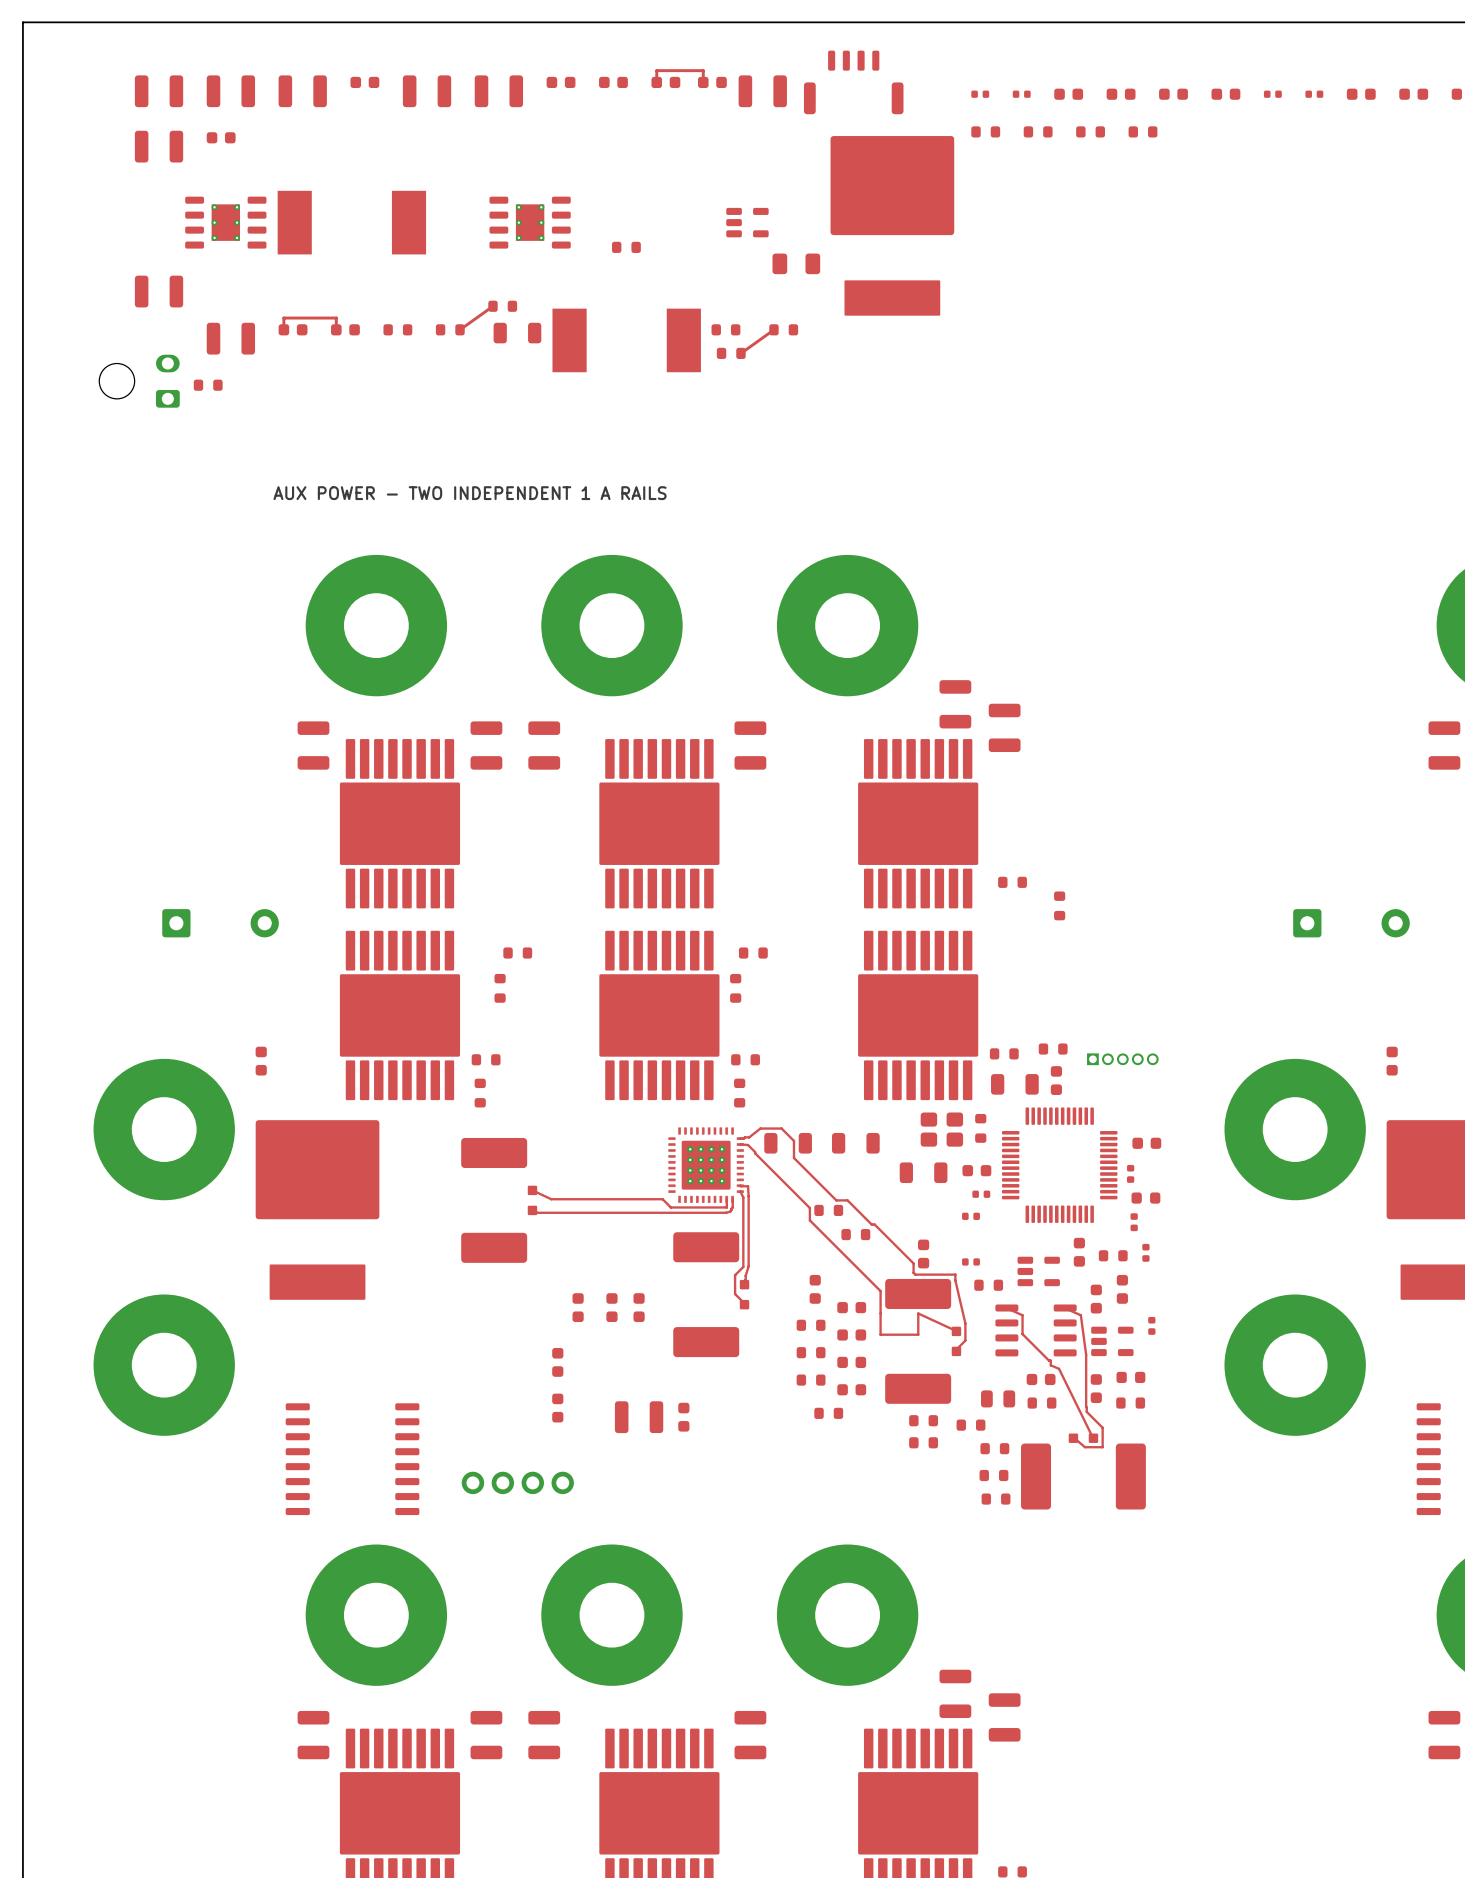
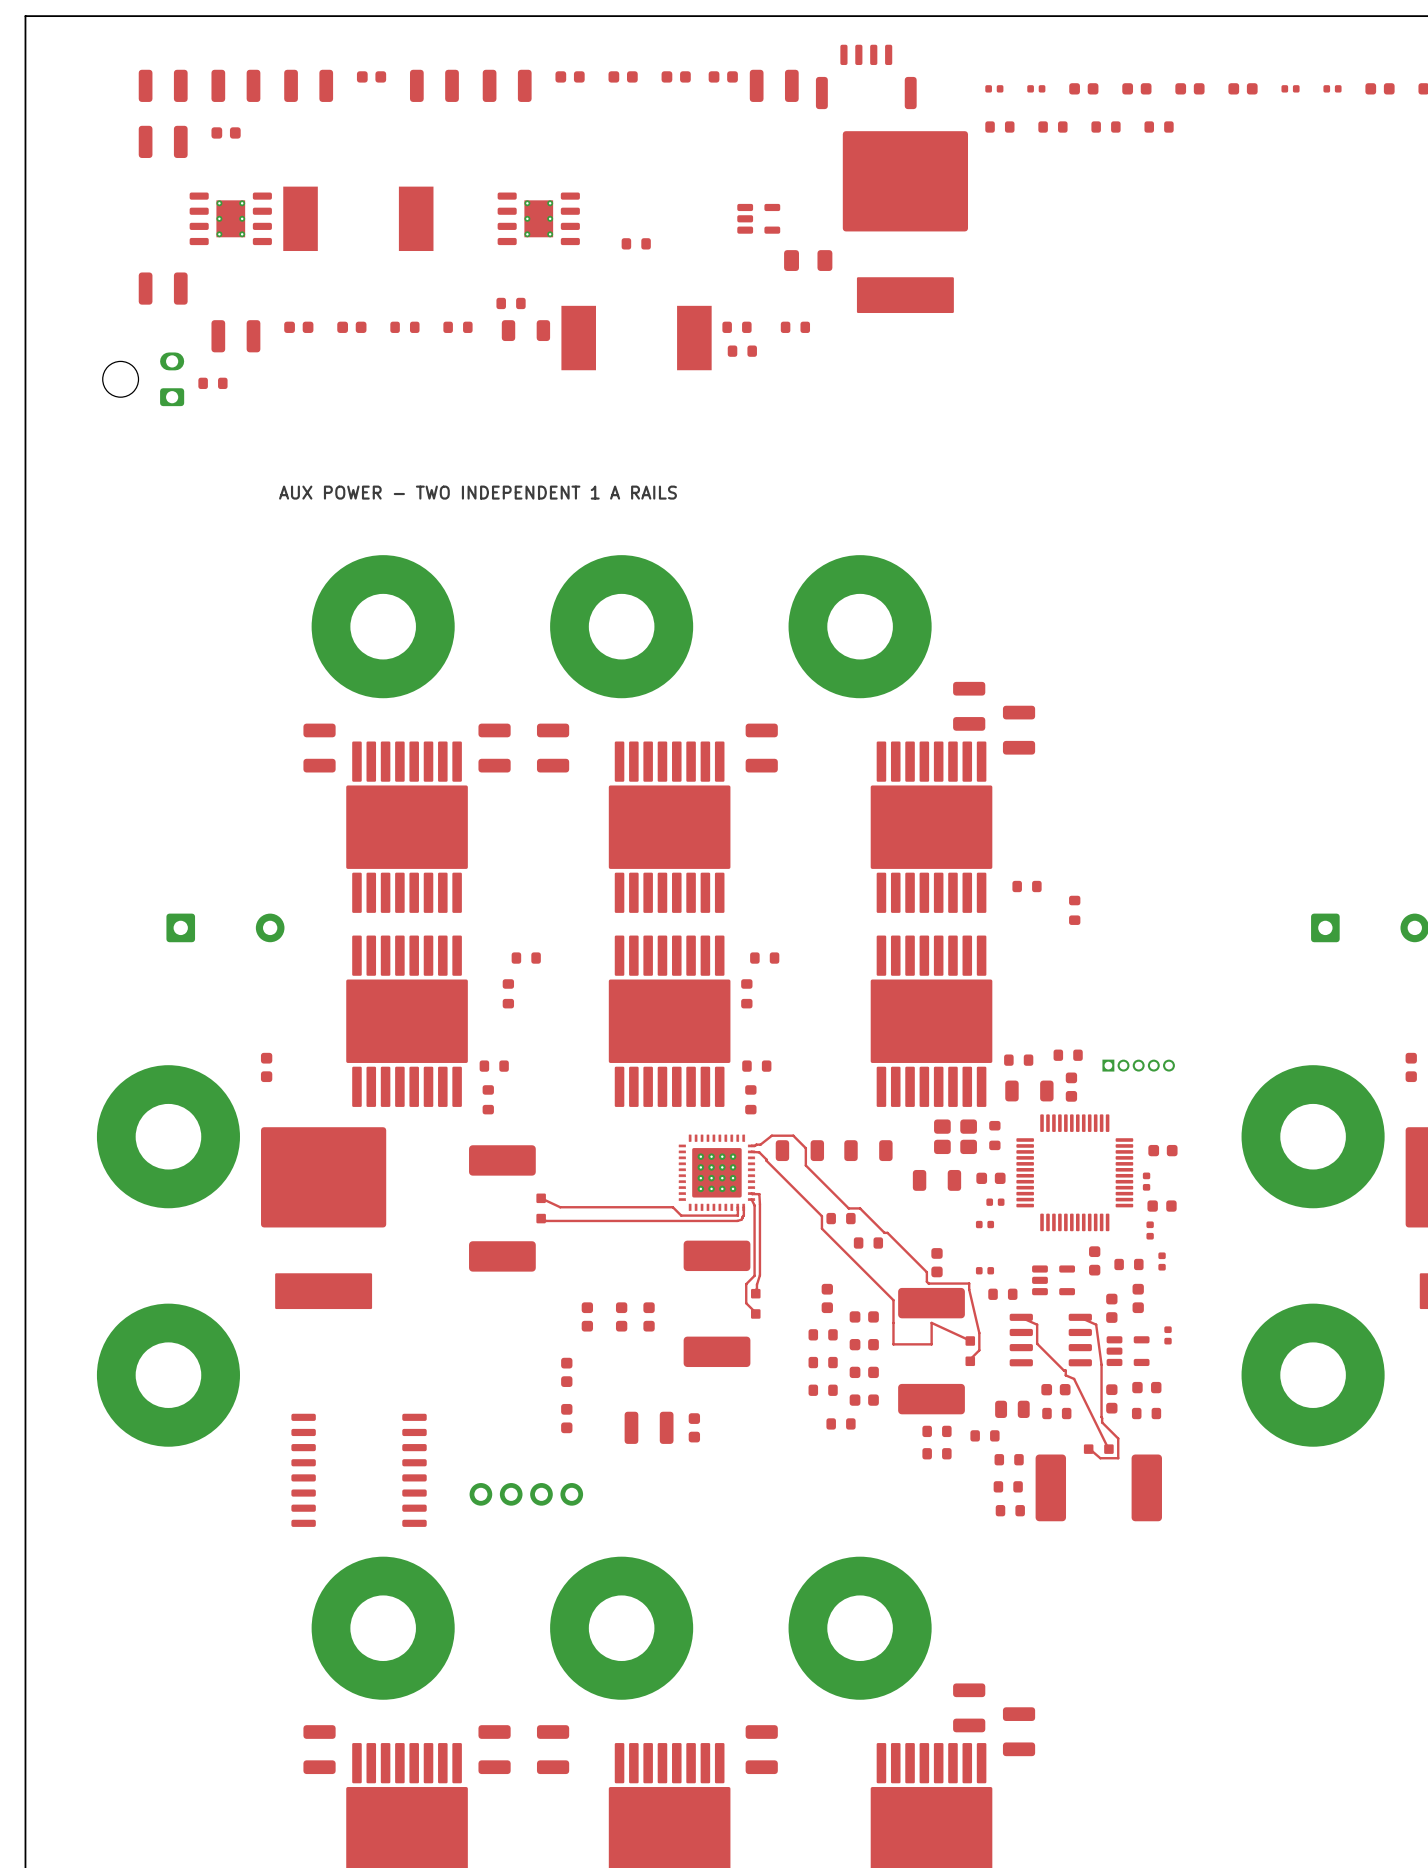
track: (656, 82) (656, 70) (703, 70) (703, 82) -> none
track: (493, 306) (460, 329) -> none
track: (283, 329) (283, 318) (336, 318) (336, 329) -> none
track: (773, 329) (740, 353) -> none

